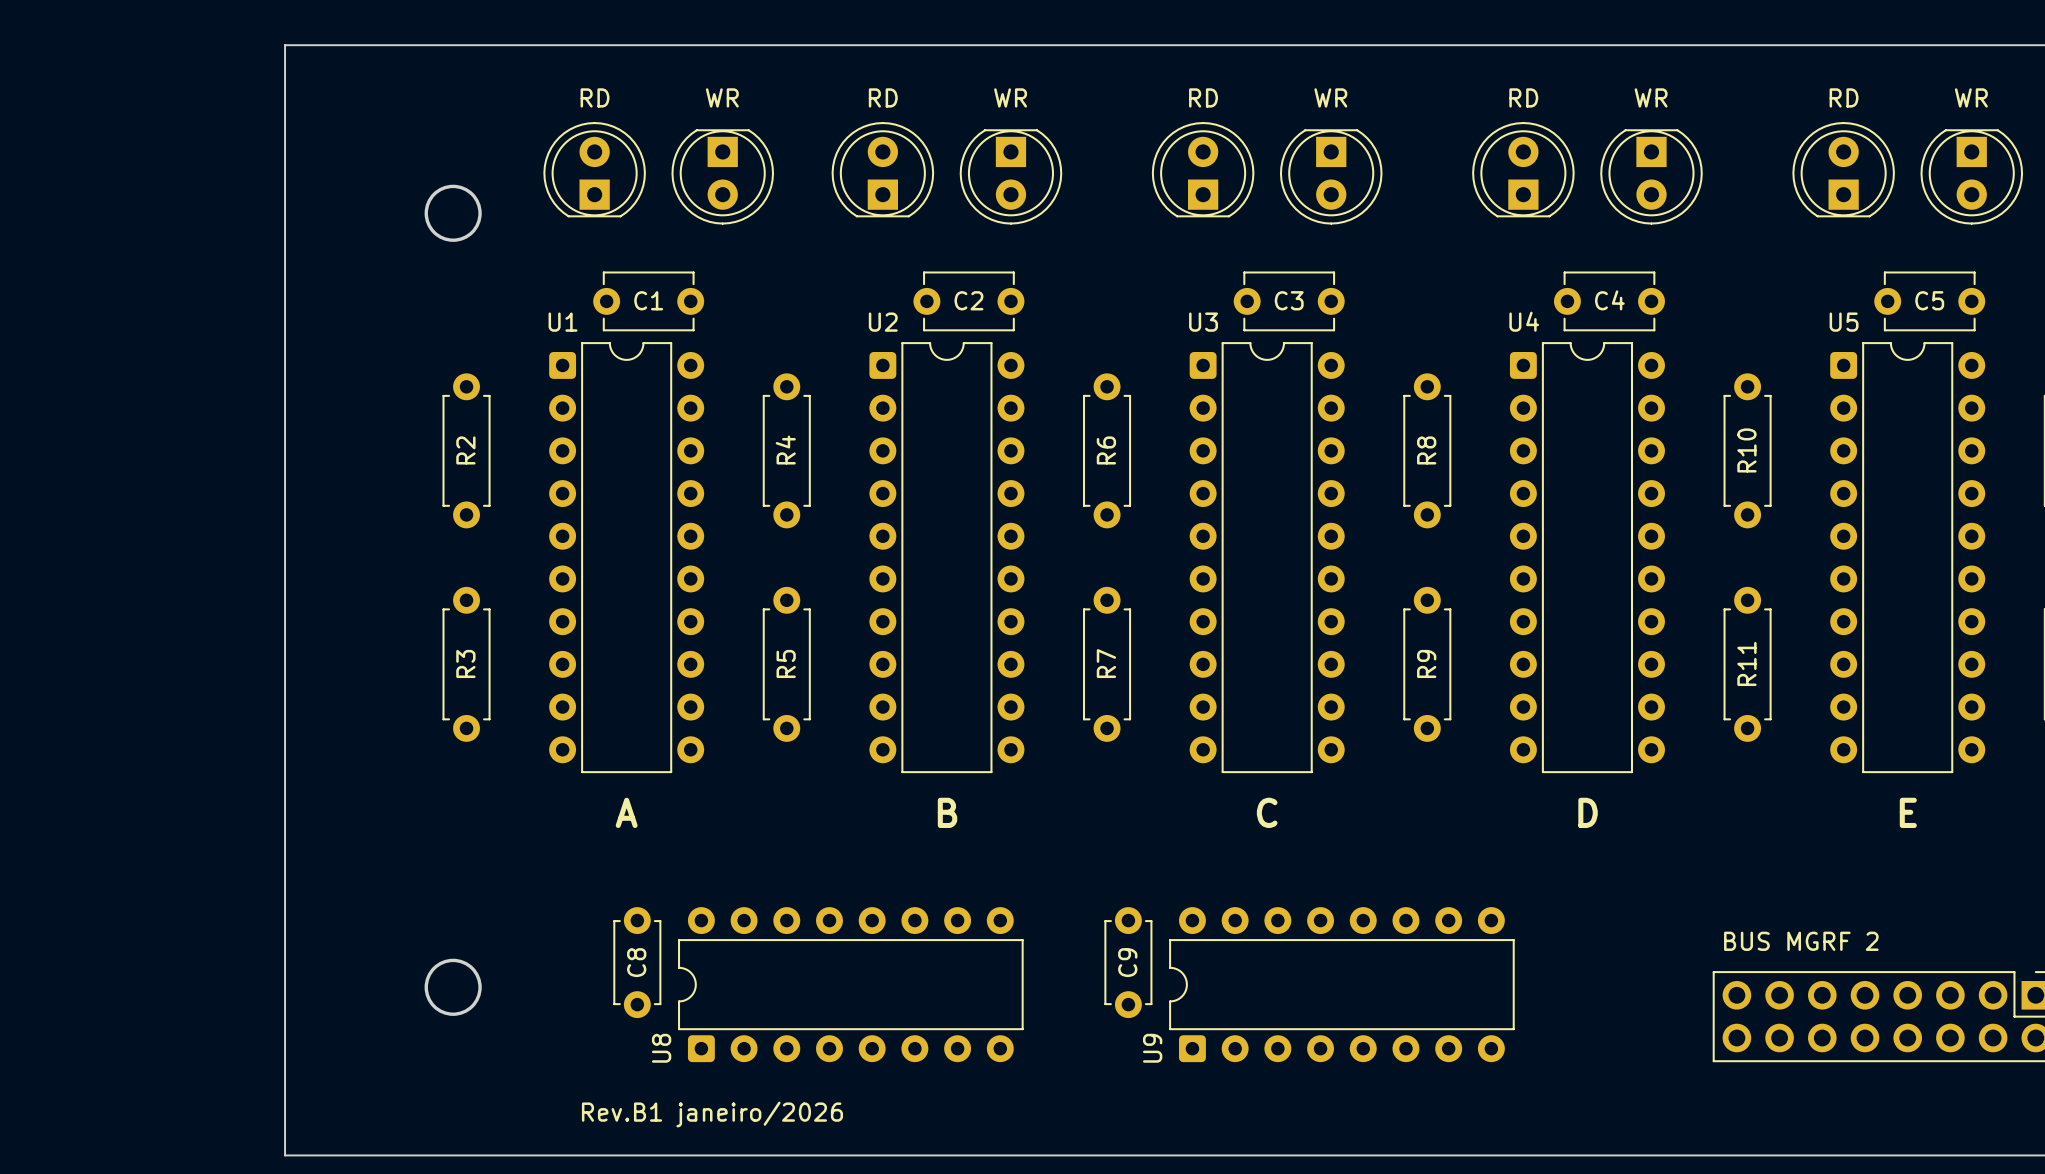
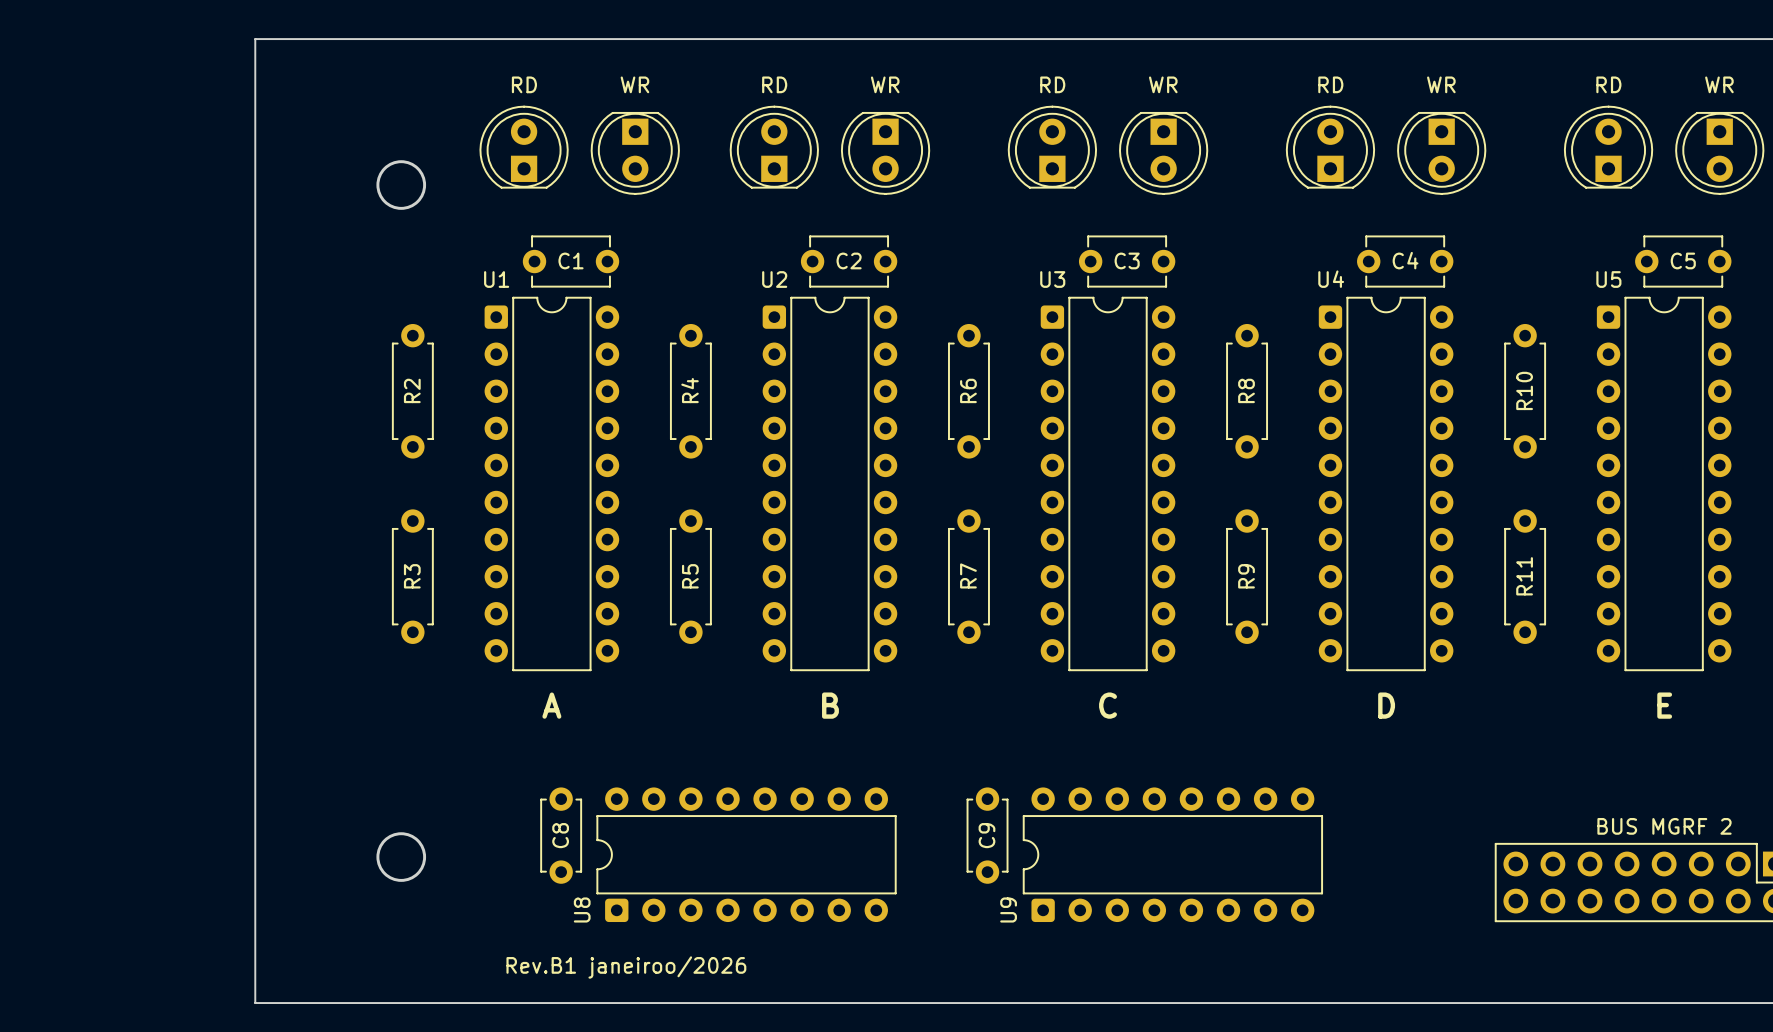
text position: BUS MGRF 2 (1801, 941) -> BUS MGRF 2 (1664, 826)
text: Rev.B1 janeiro/2026 (712, 1114) -> Rev.B1 janeiroo/2026 (626, 967)

